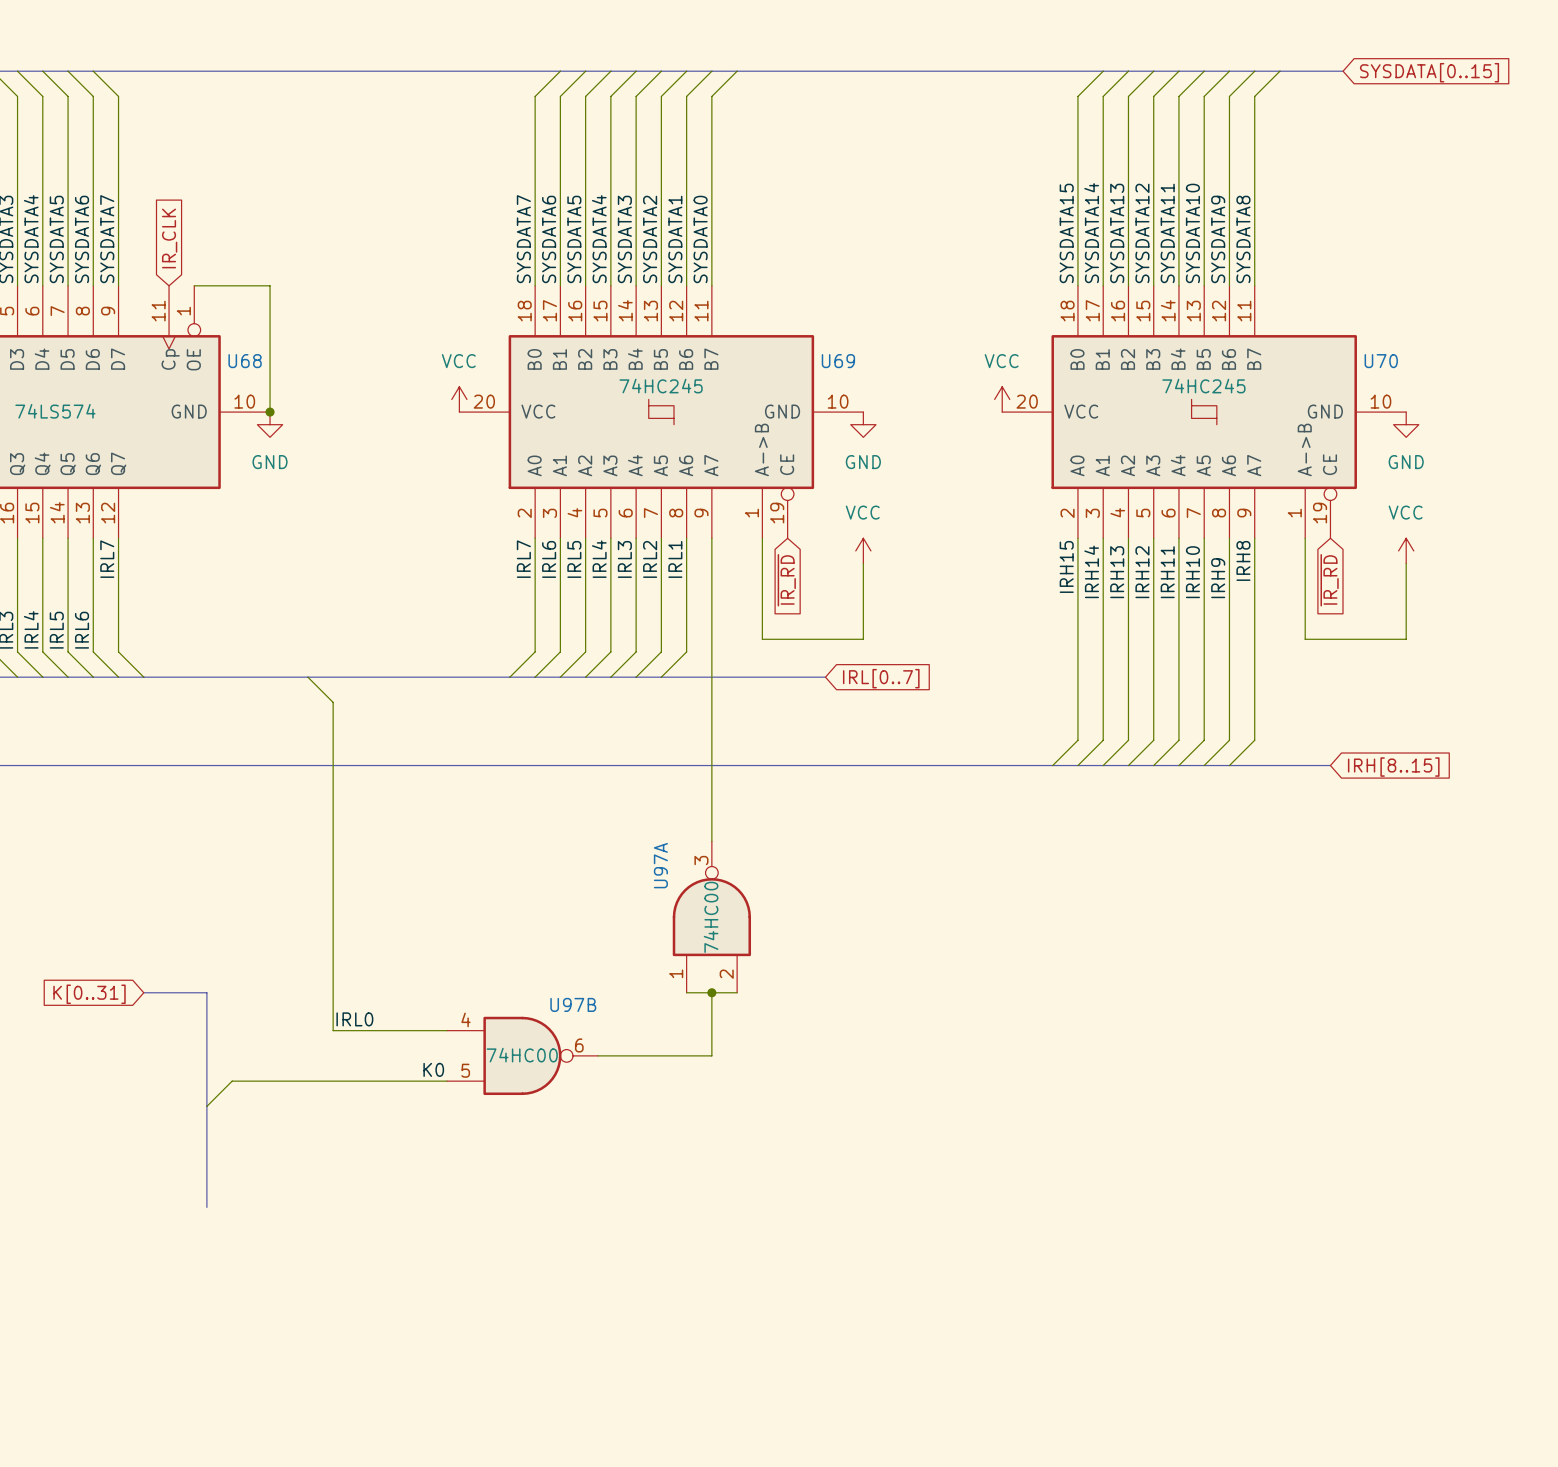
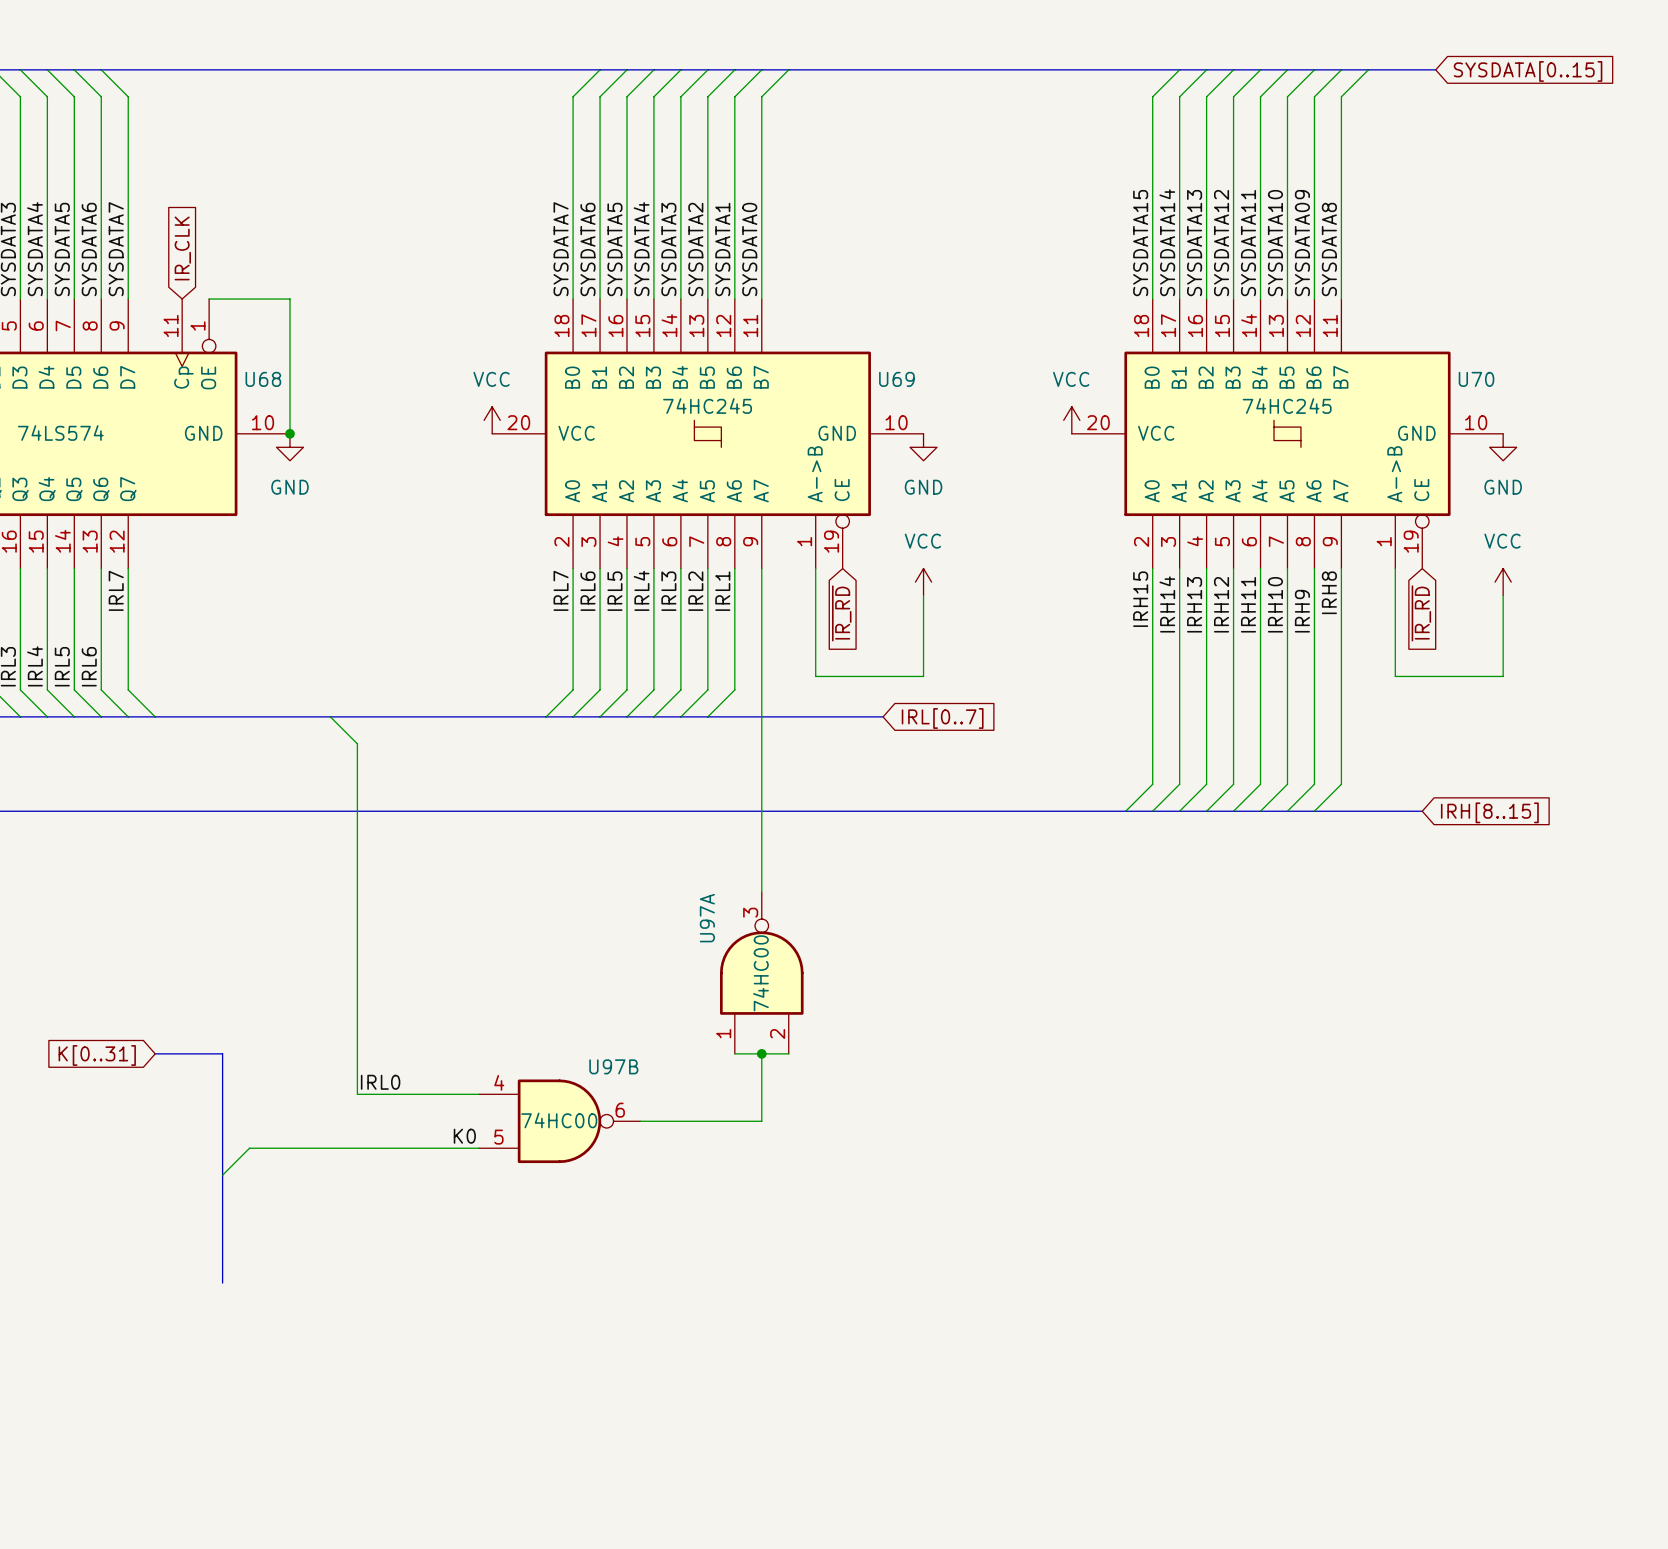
label: SYSDATA9 (1218, 239) -> SYSDATA09 (1302, 243)

